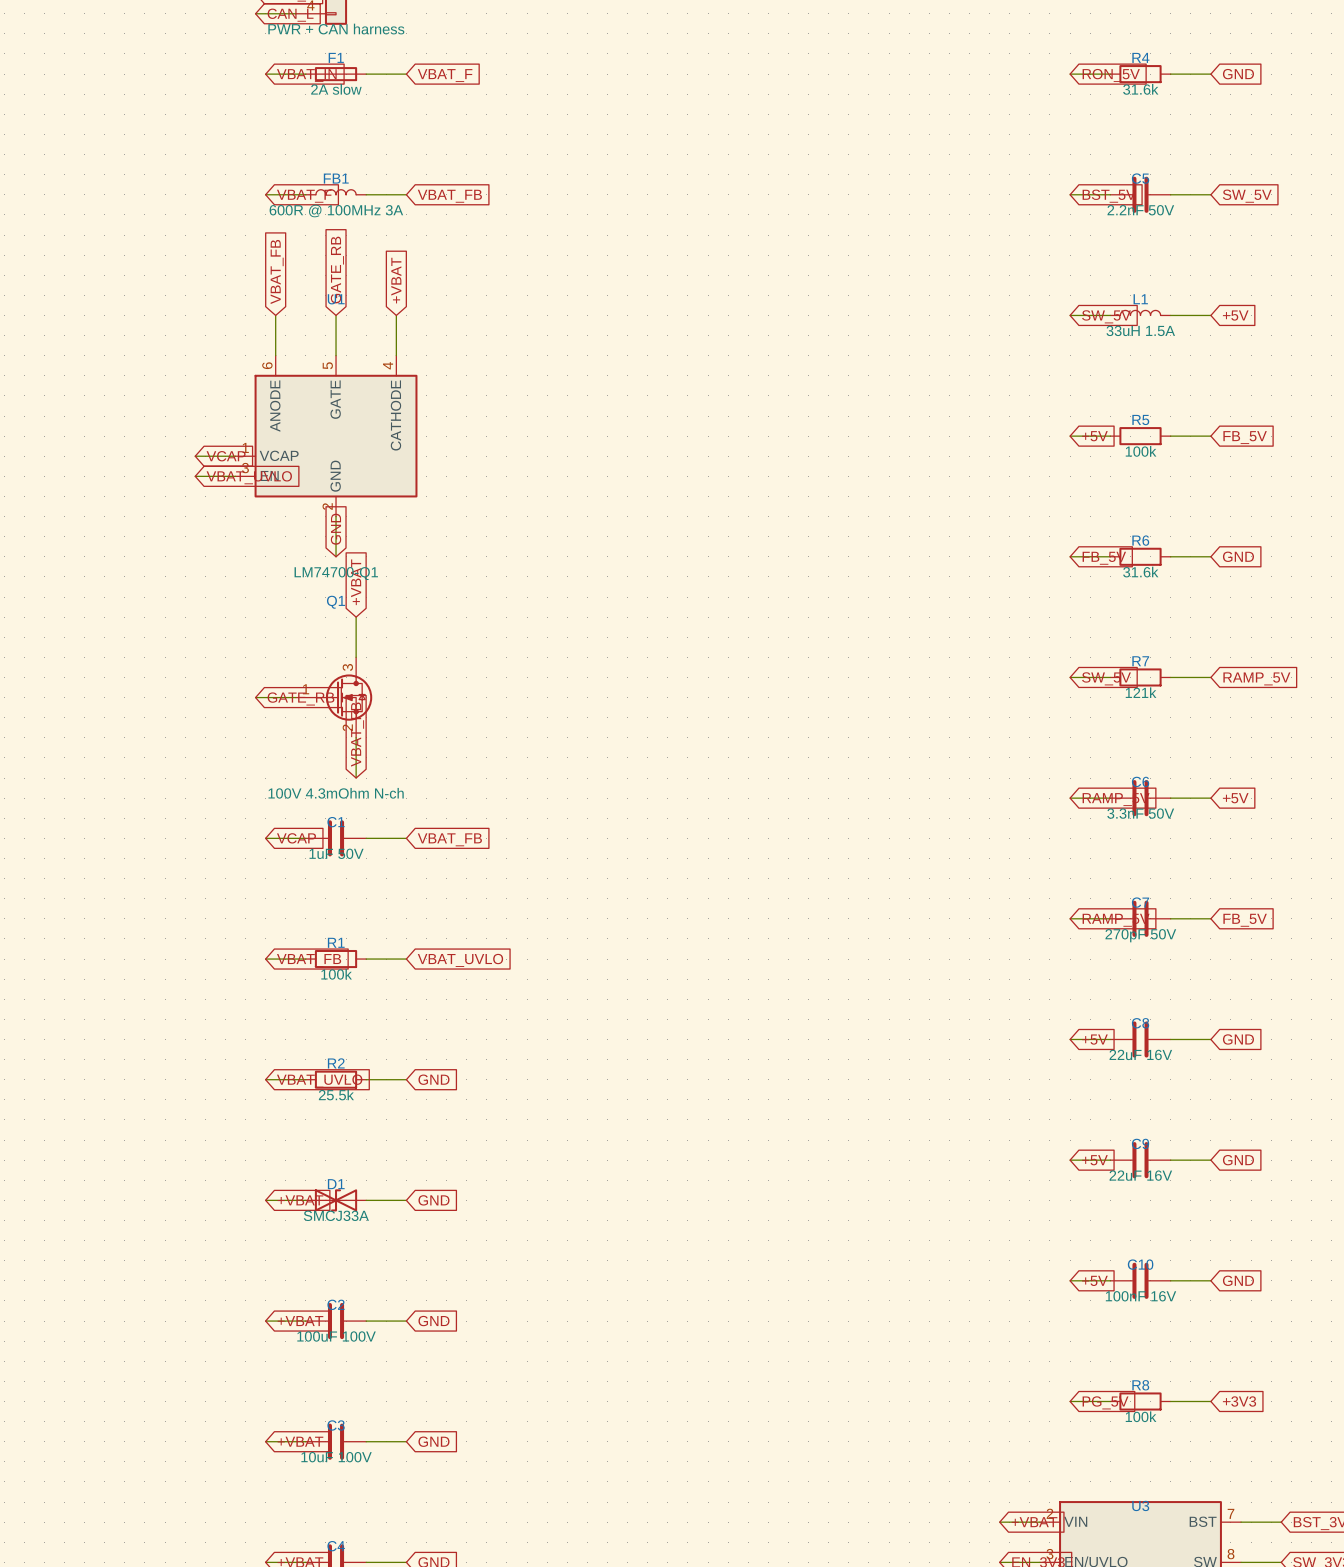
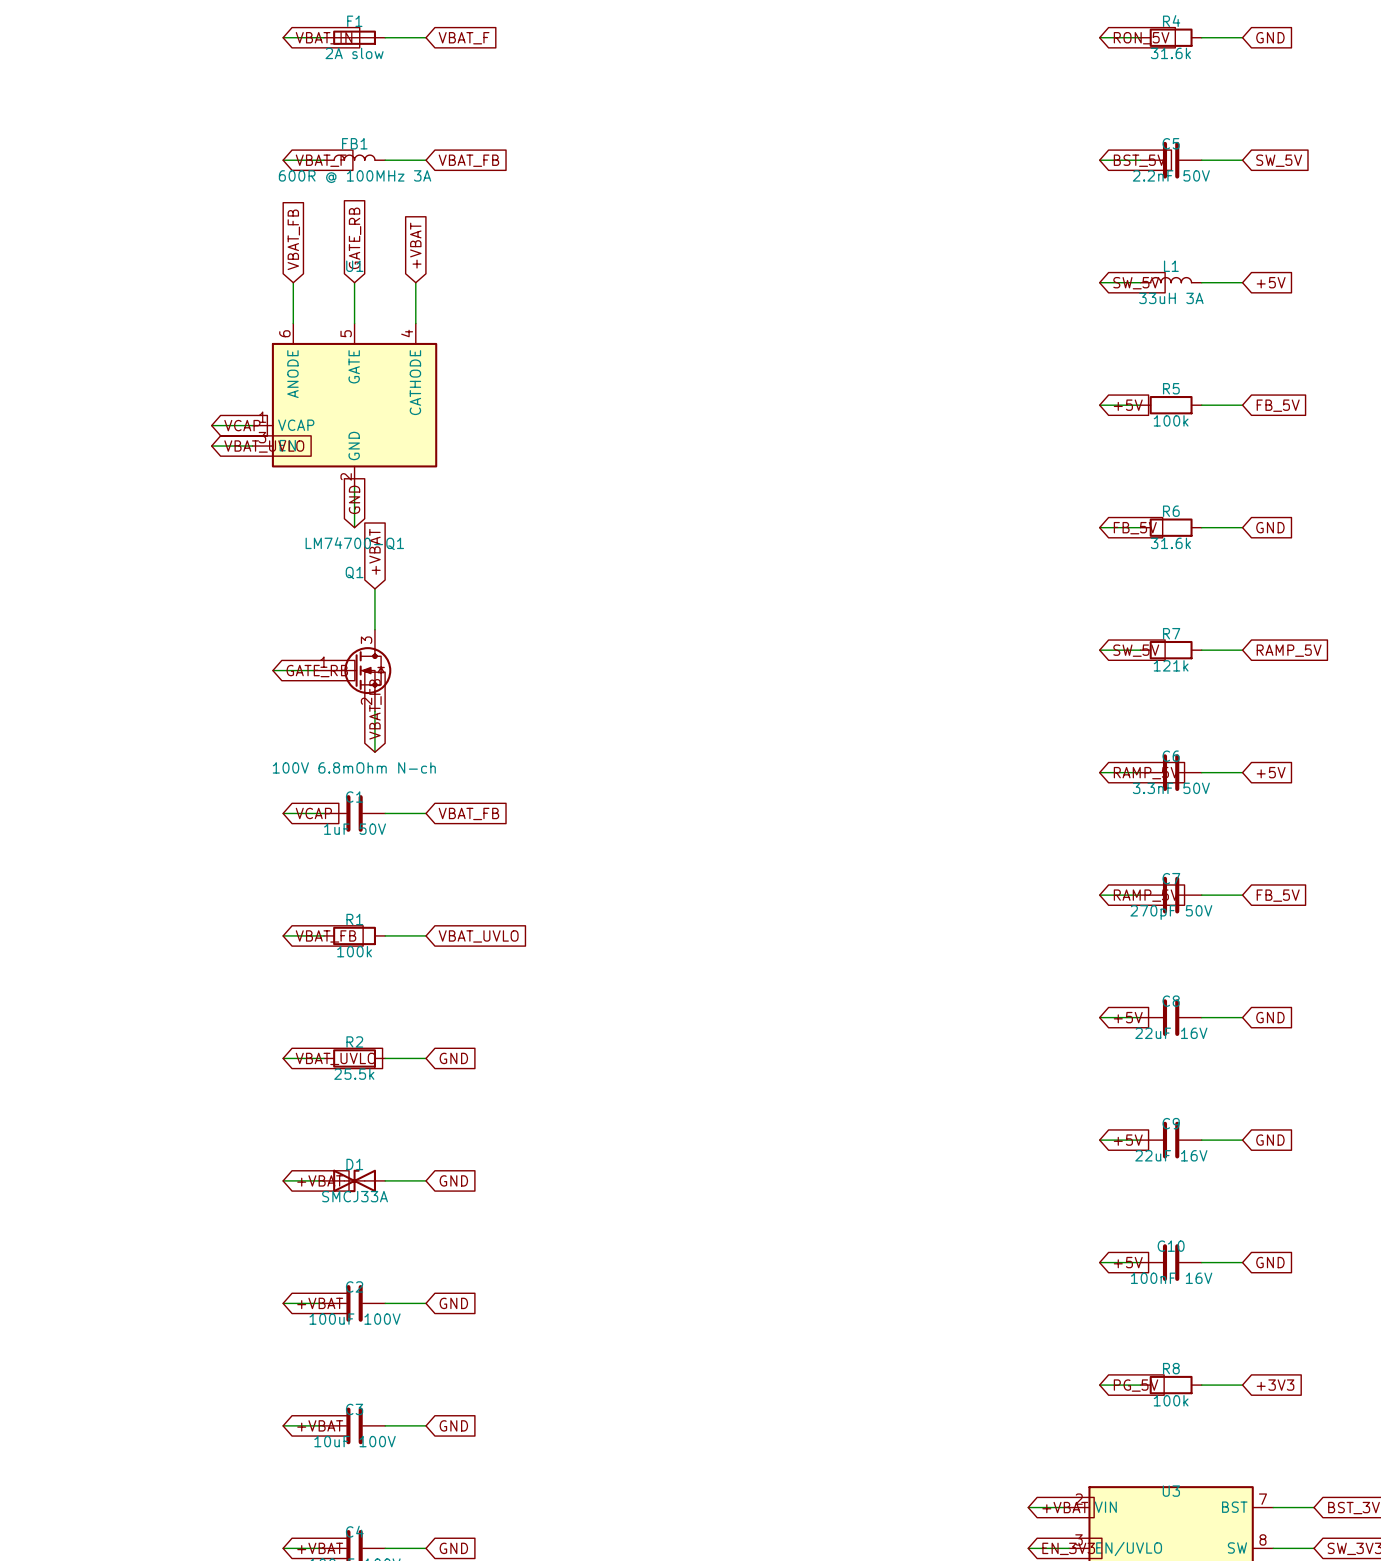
L1 value: 33uH 1.5A (1140, 330) -> 33uH 3A (1171, 298)
Q1 value: 100V 4.3mOhm N-ch (336, 793) -> 100V 6.8mOhm N-ch (354, 767)

